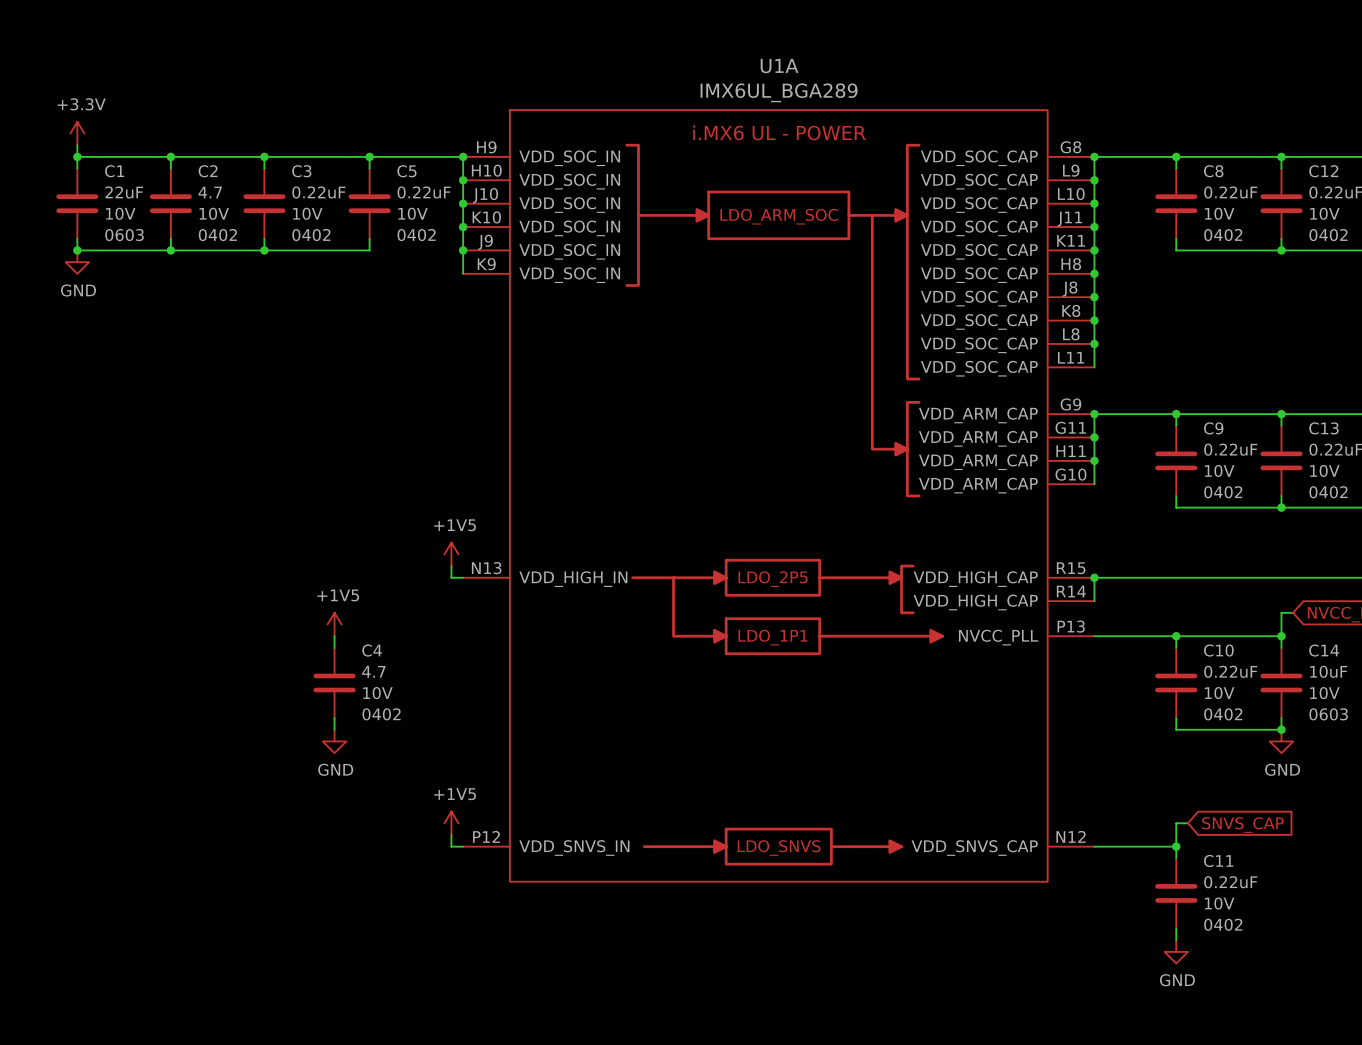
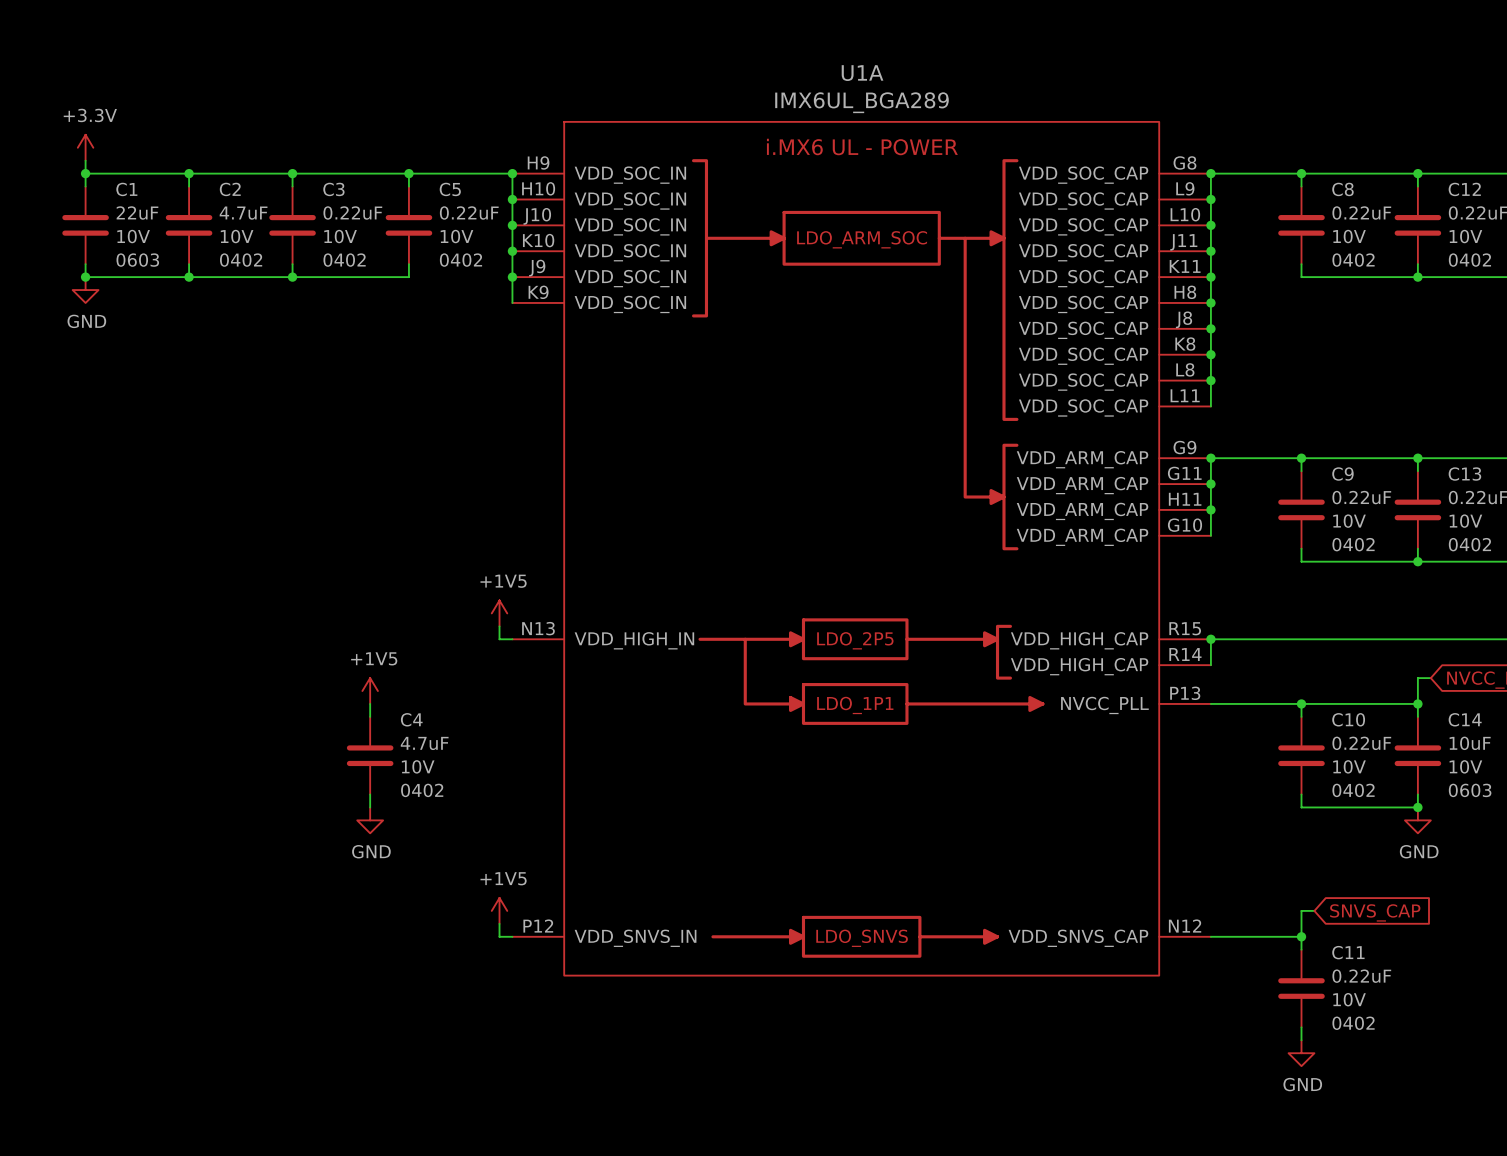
C2 value: 4.7 (210, 192) -> 4.7uF (243, 213)
C4 value: 4.7 (373, 671) -> 4.7uF (424, 743)

